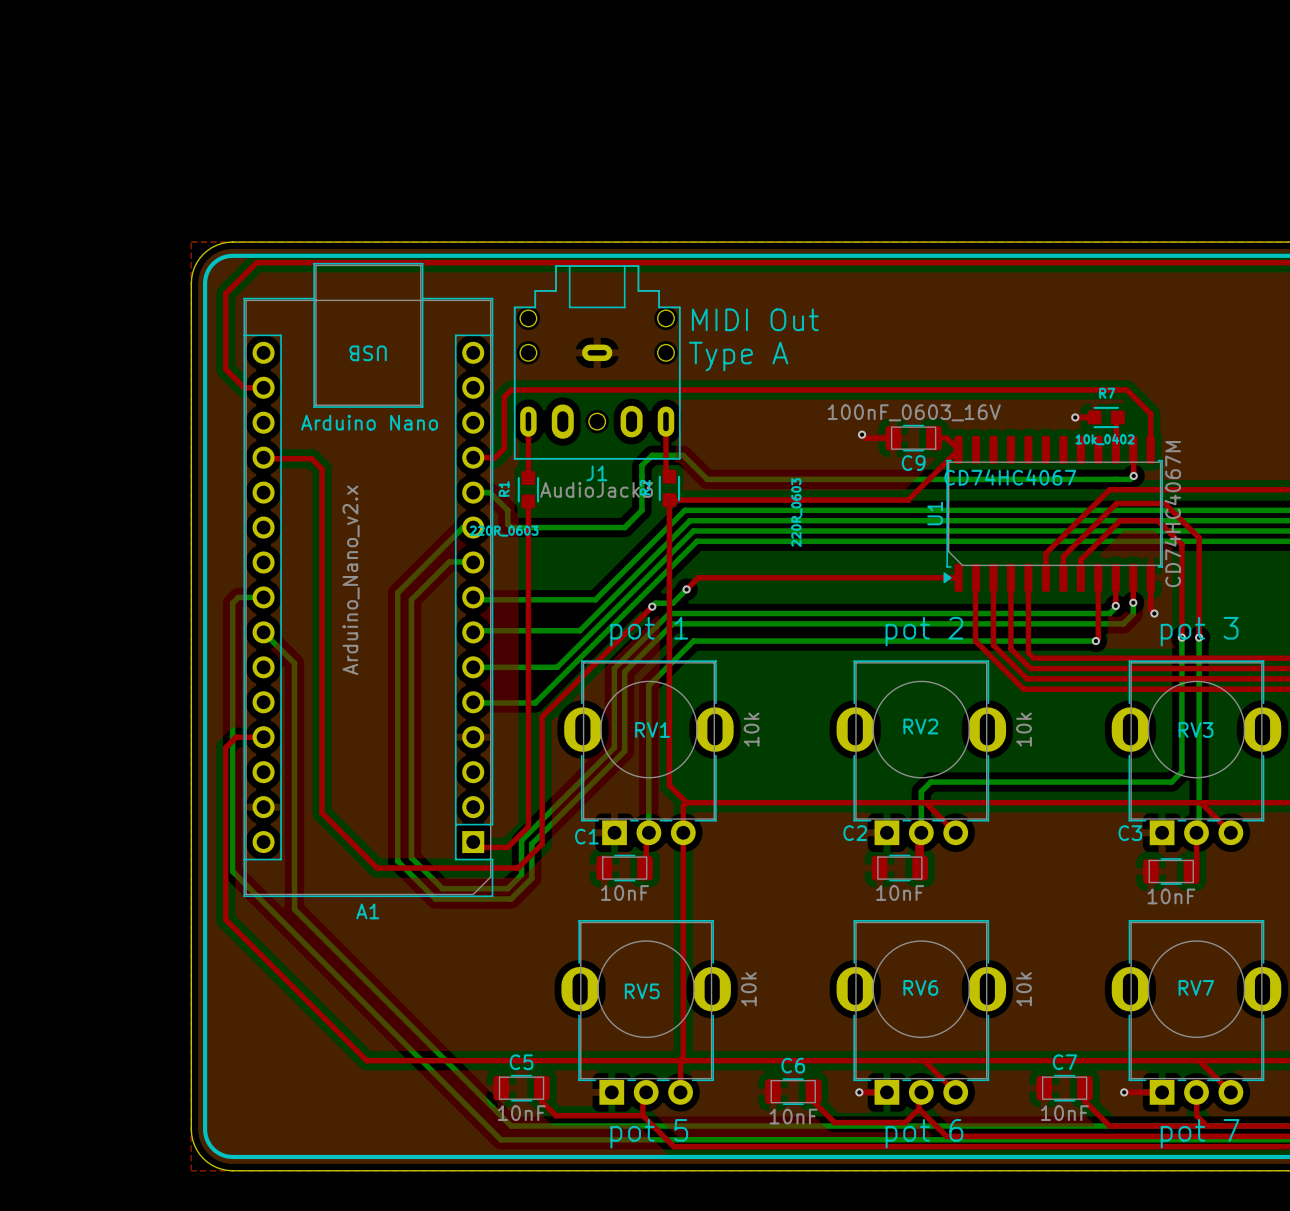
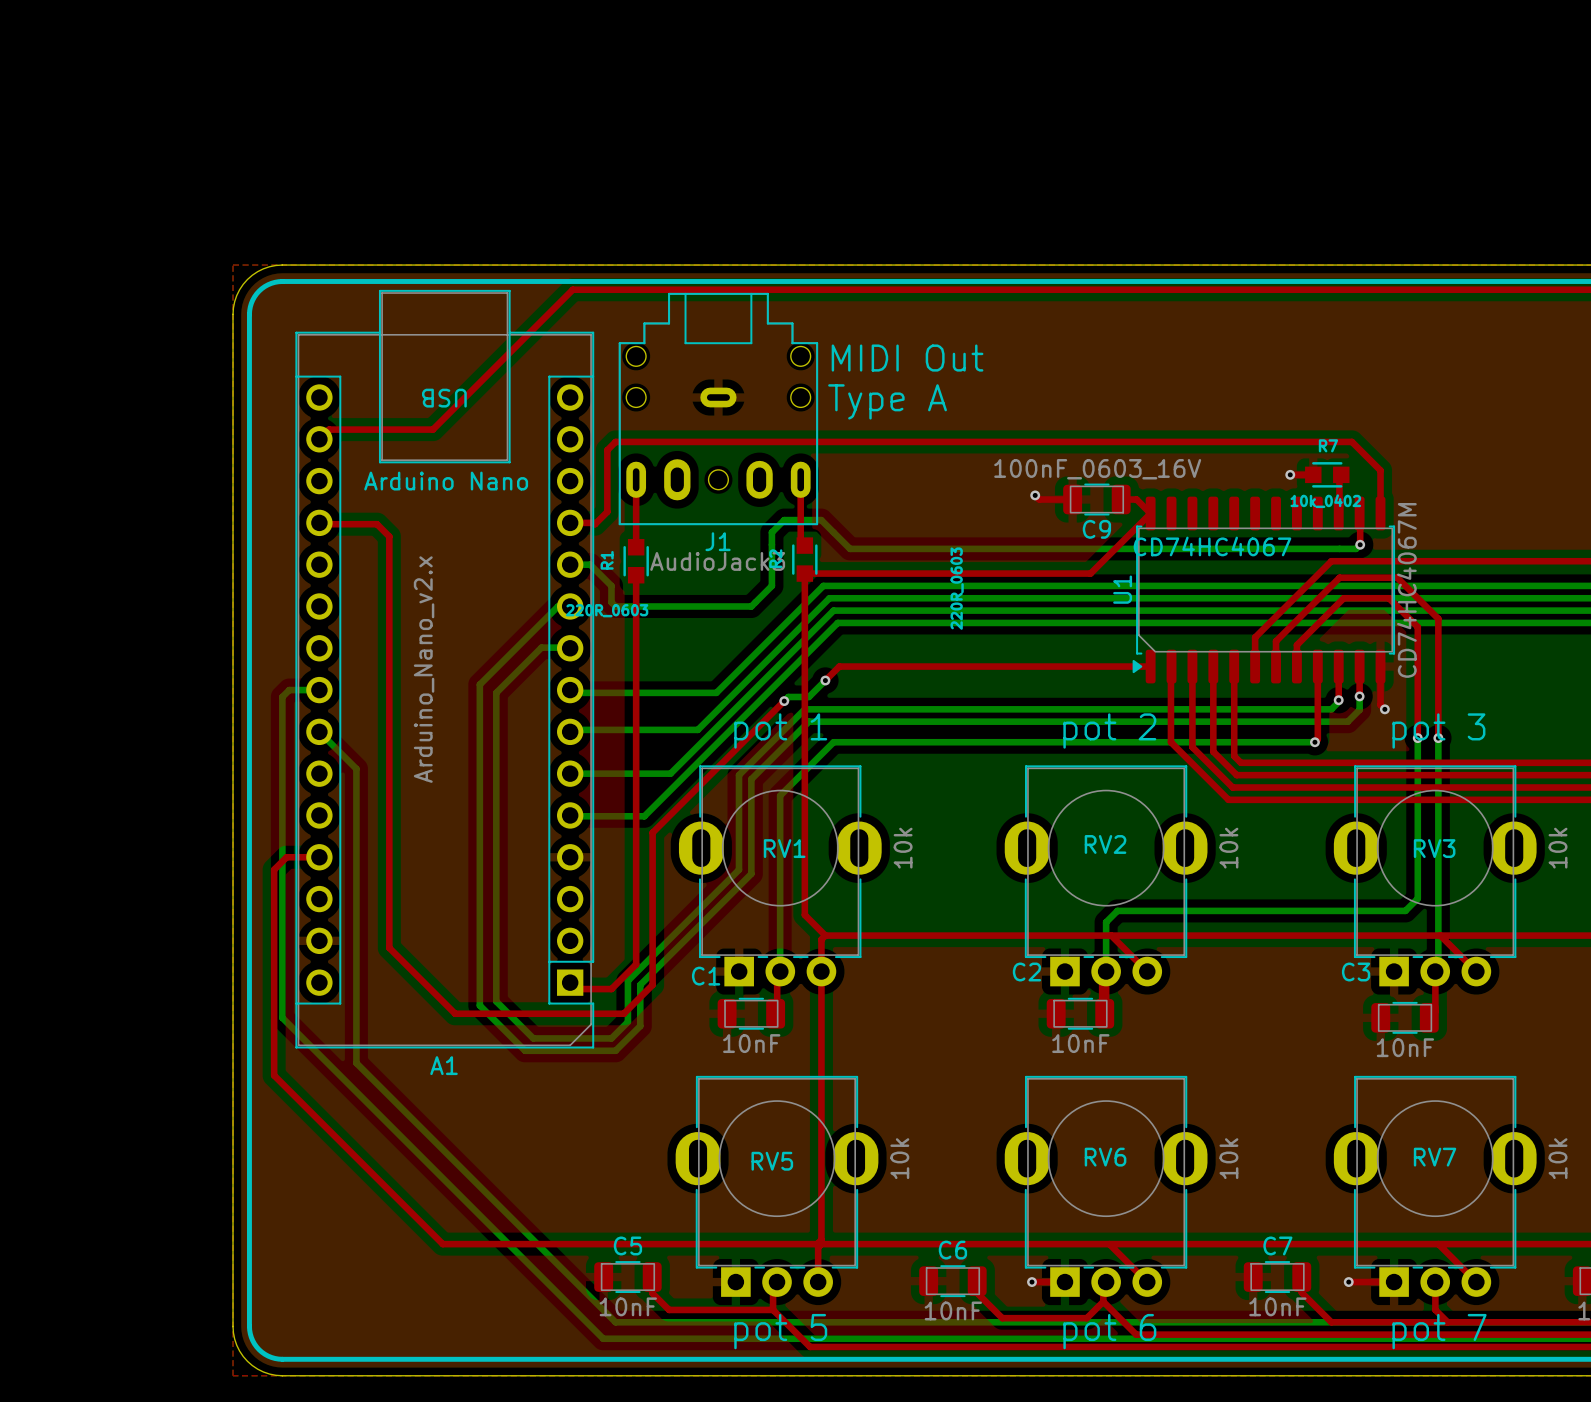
top track: (475, 262) (256, 262) (225, 293) (225, 369) (244, 387) (263, 387) -> (572, 289) (432, 429) (329, 429) (319, 439)

